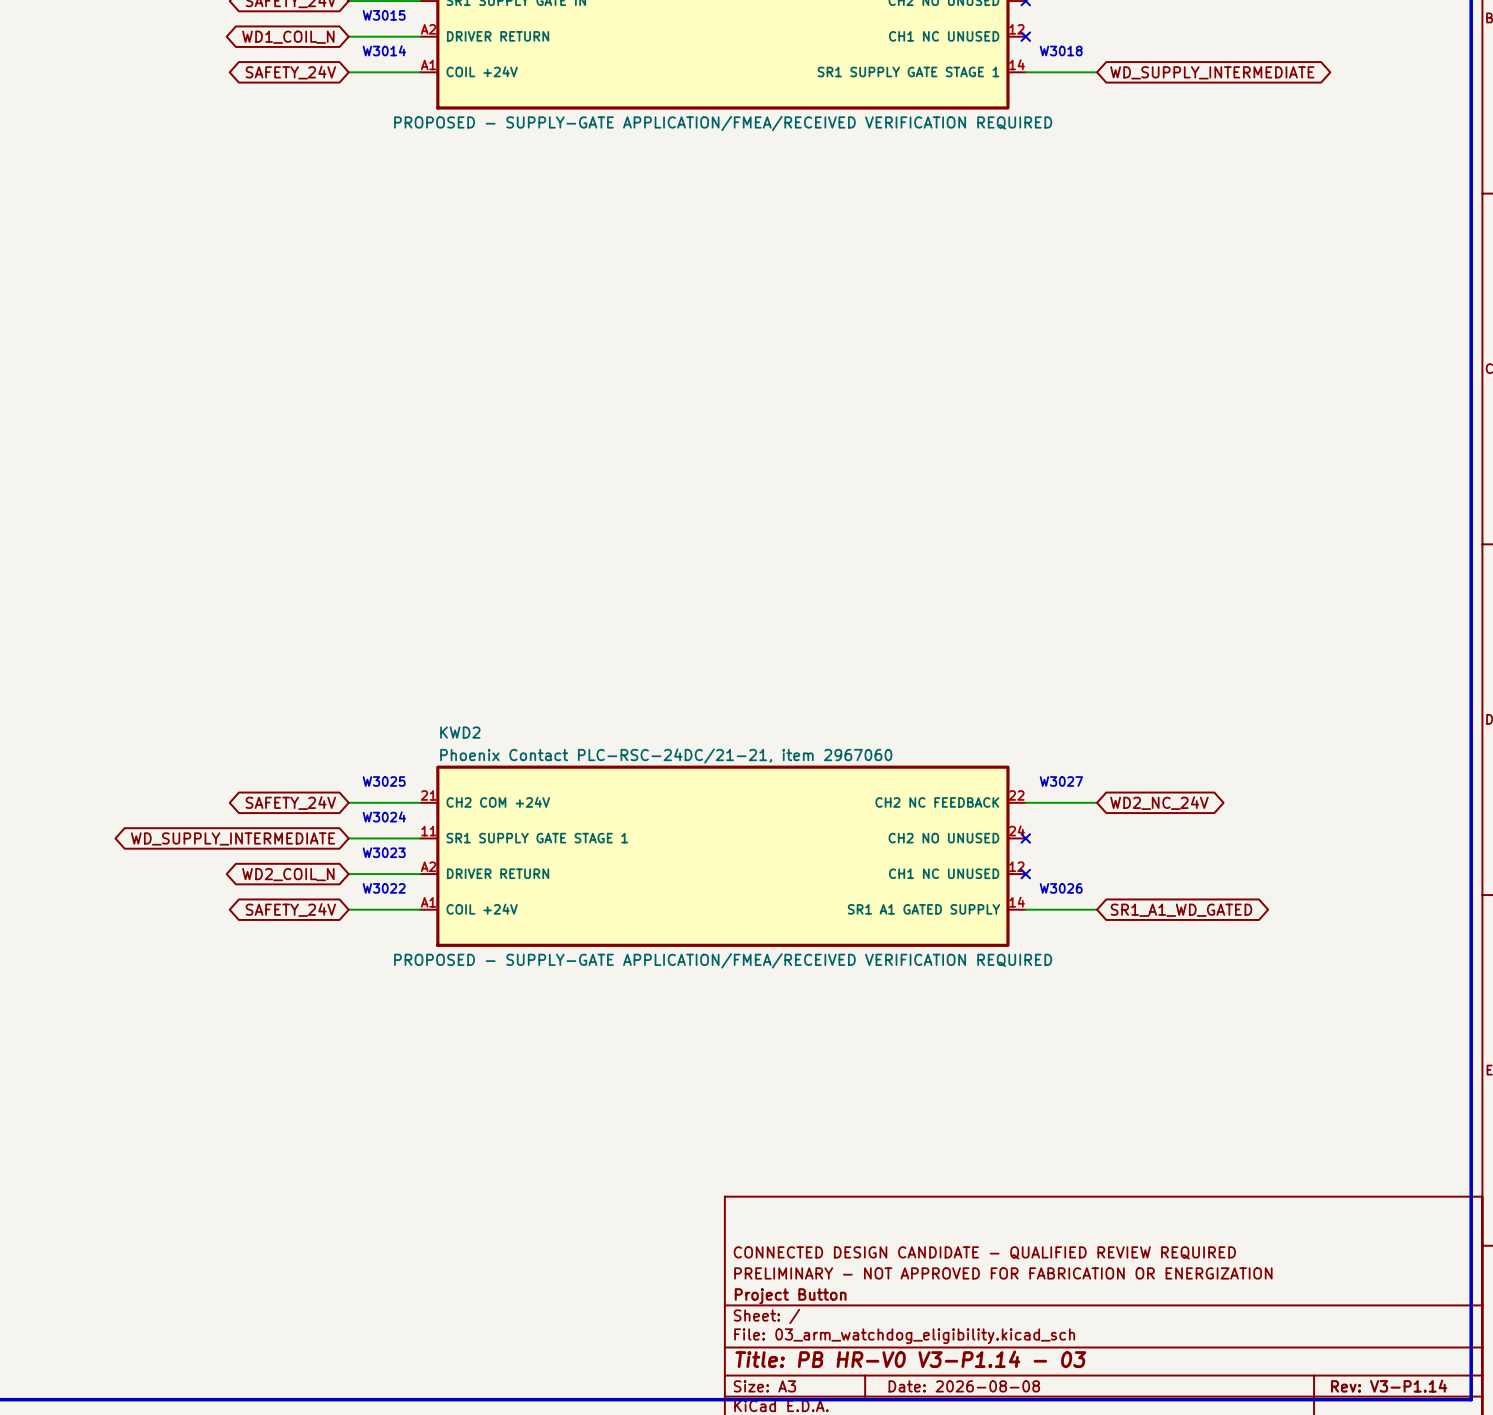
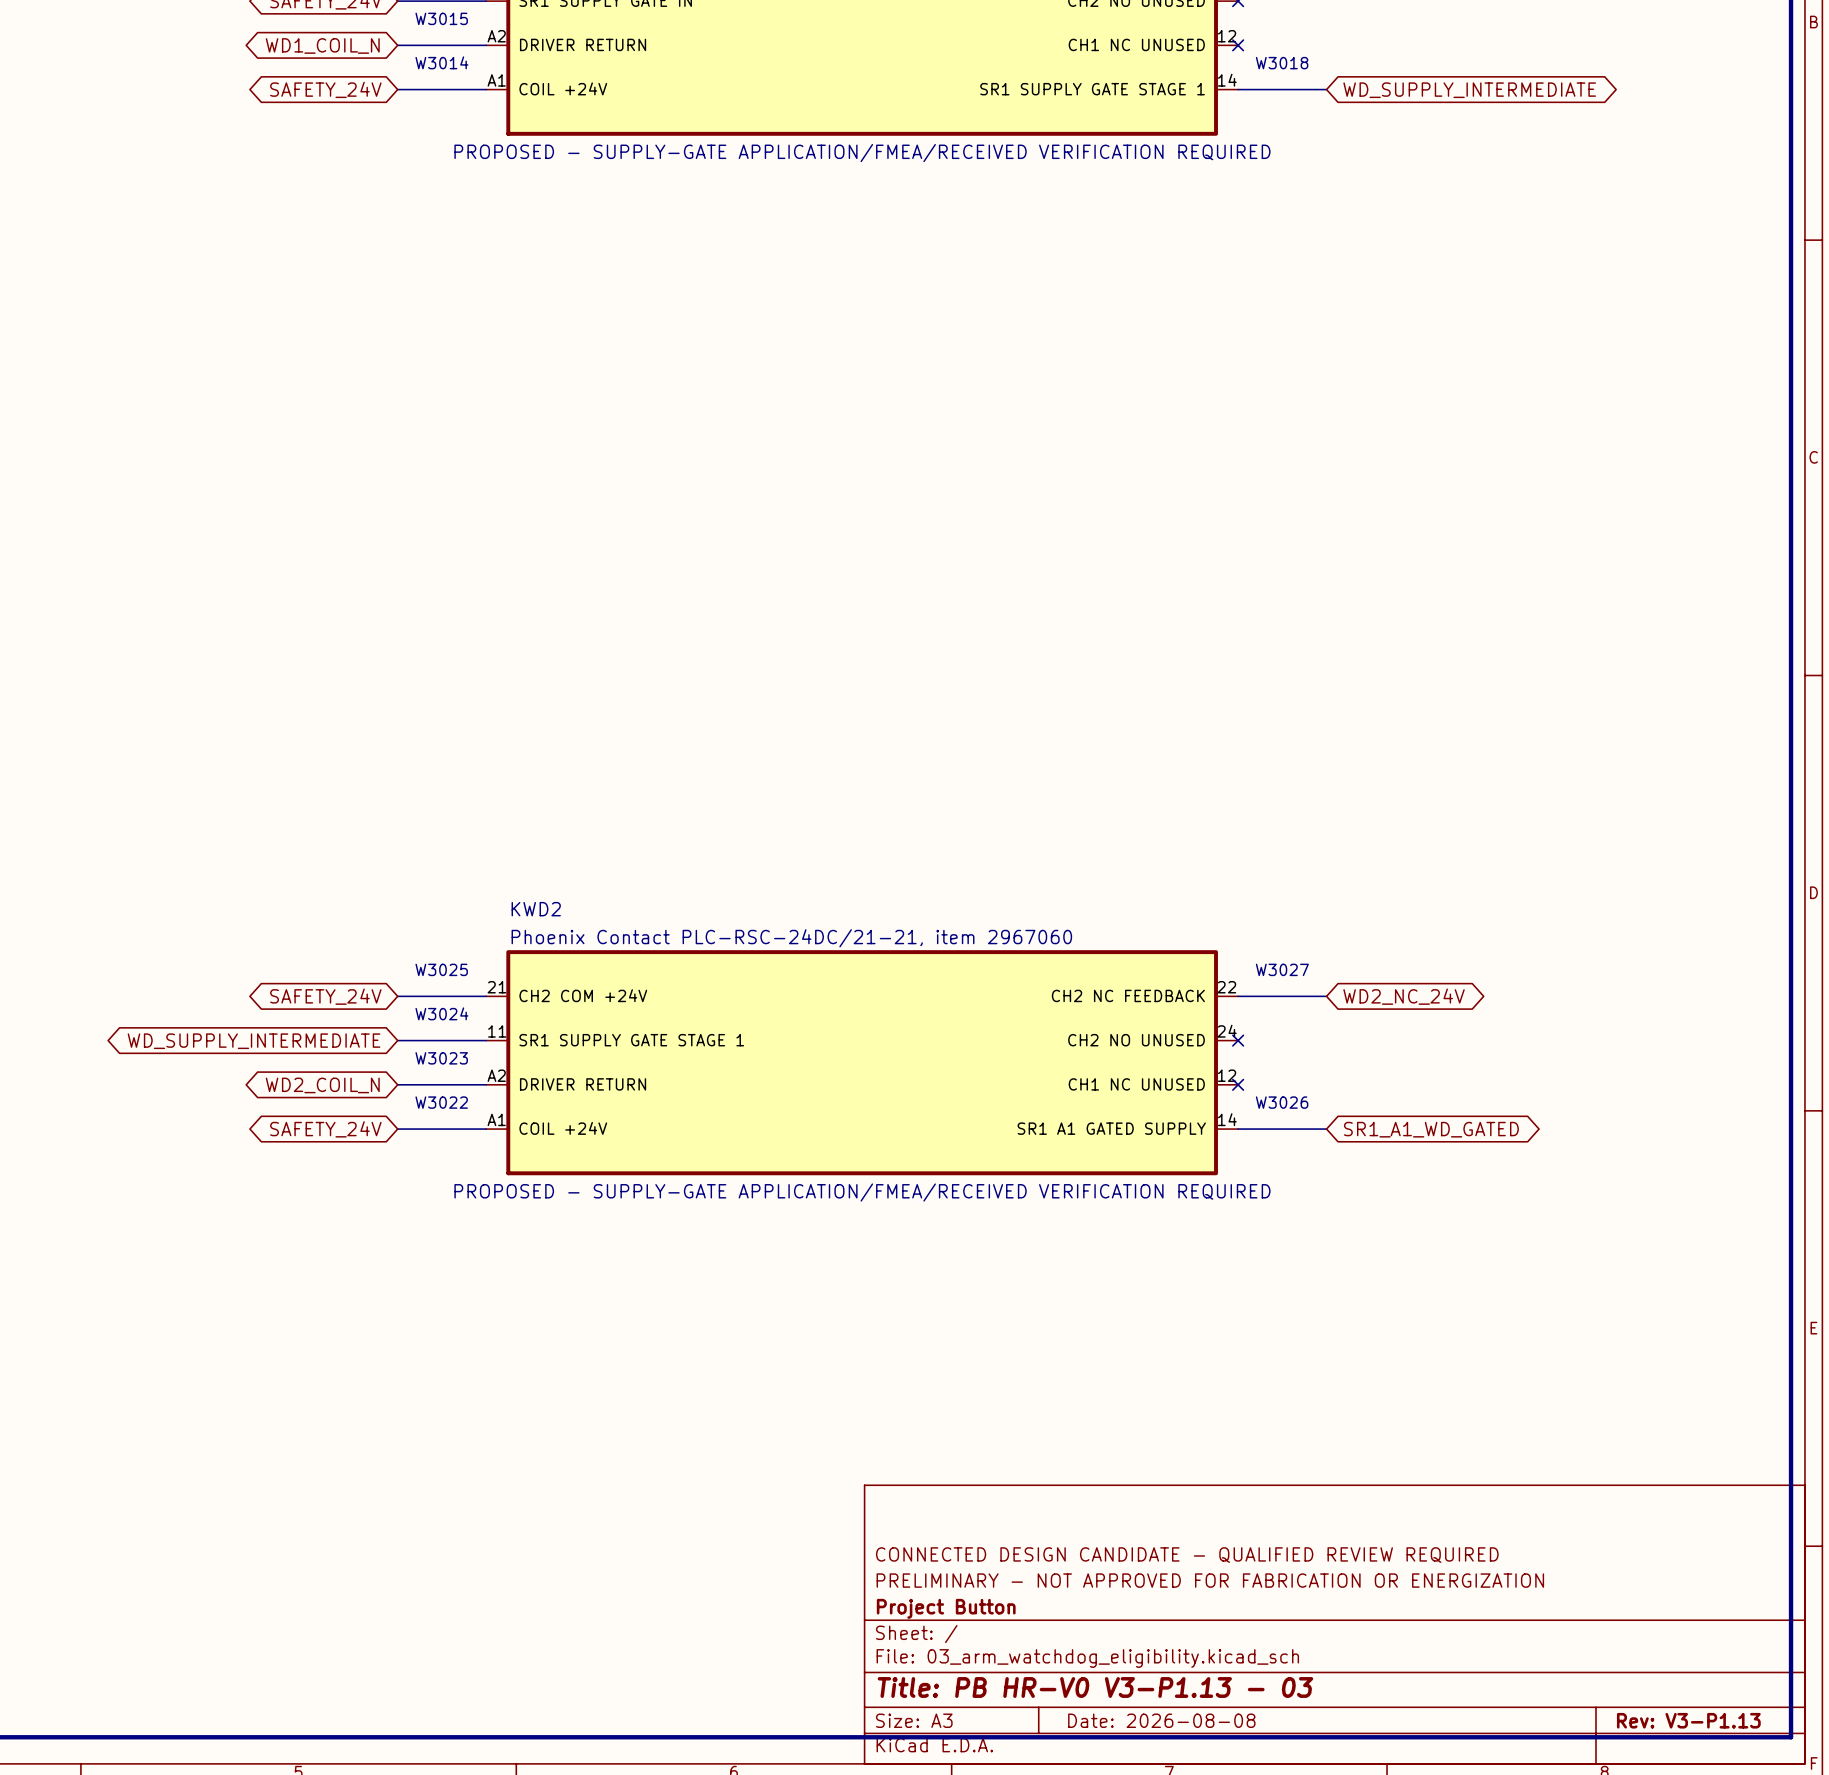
title block: Title: PB HR-V0 V3-P1.14 - 03 (910, 1359) -> Title: PB HR-V0 V3-P1.13 - 03 (1095, 1687)
title block: Rev: V3-P1.14 (1389, 1386) -> Rev: V3-P1.13 (1688, 1720)

